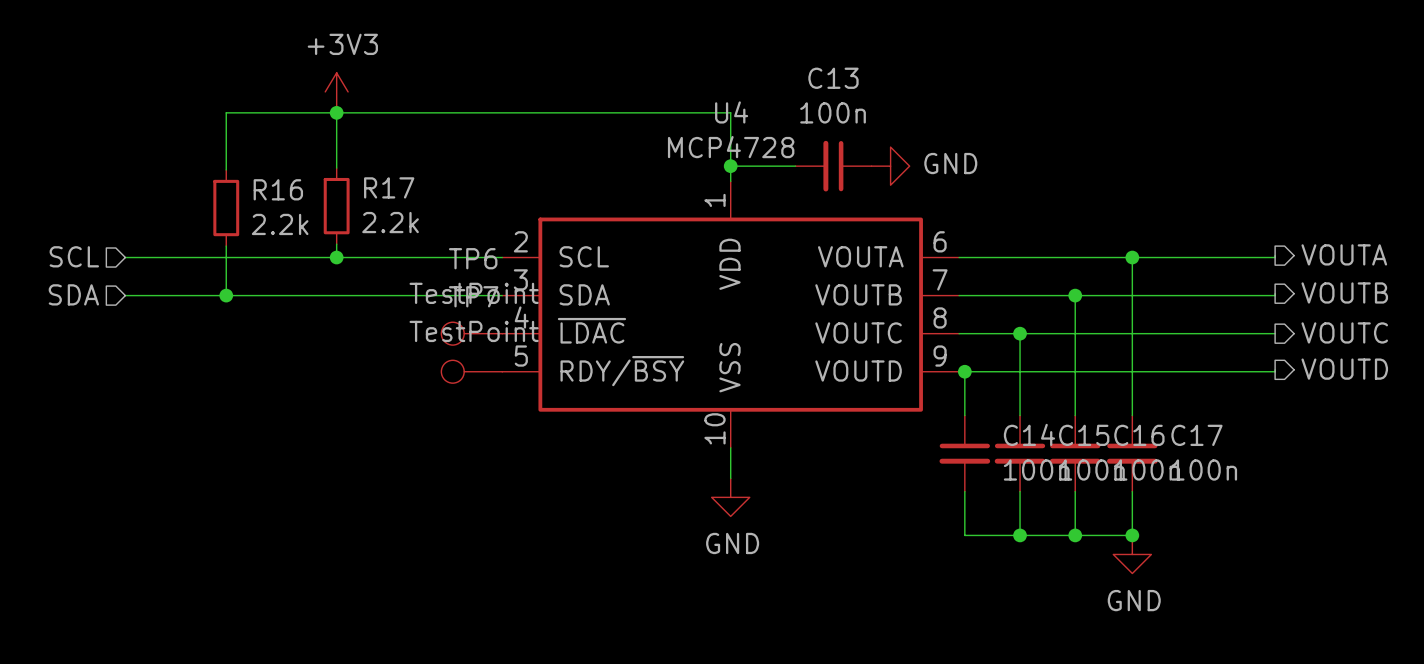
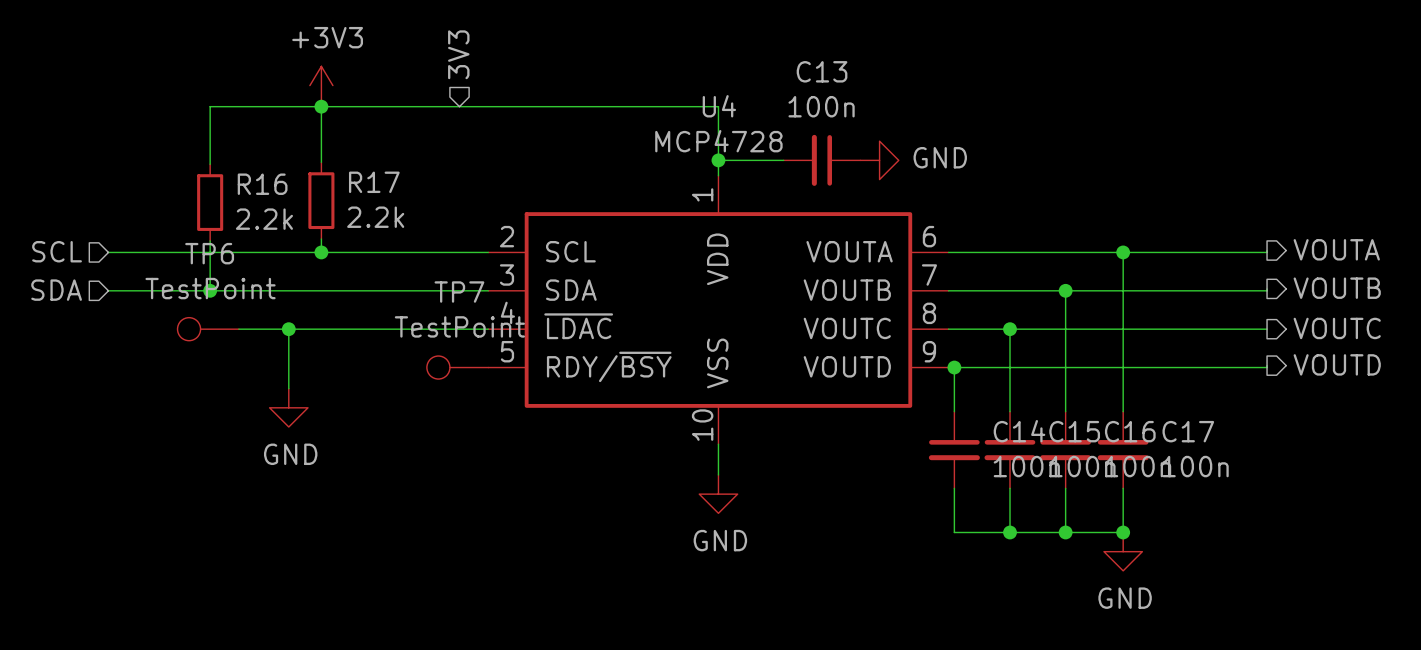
hierarchical label: none -> 3V3 (458, 54)
wire: none -> (238, 329) (488, 329)
wire: none -> (288, 329) (288, 388)
junction: none -> (288, 329)
TP6 position: (471, 333) -> (208, 329)
power symbol: none -> GND (288, 407)

